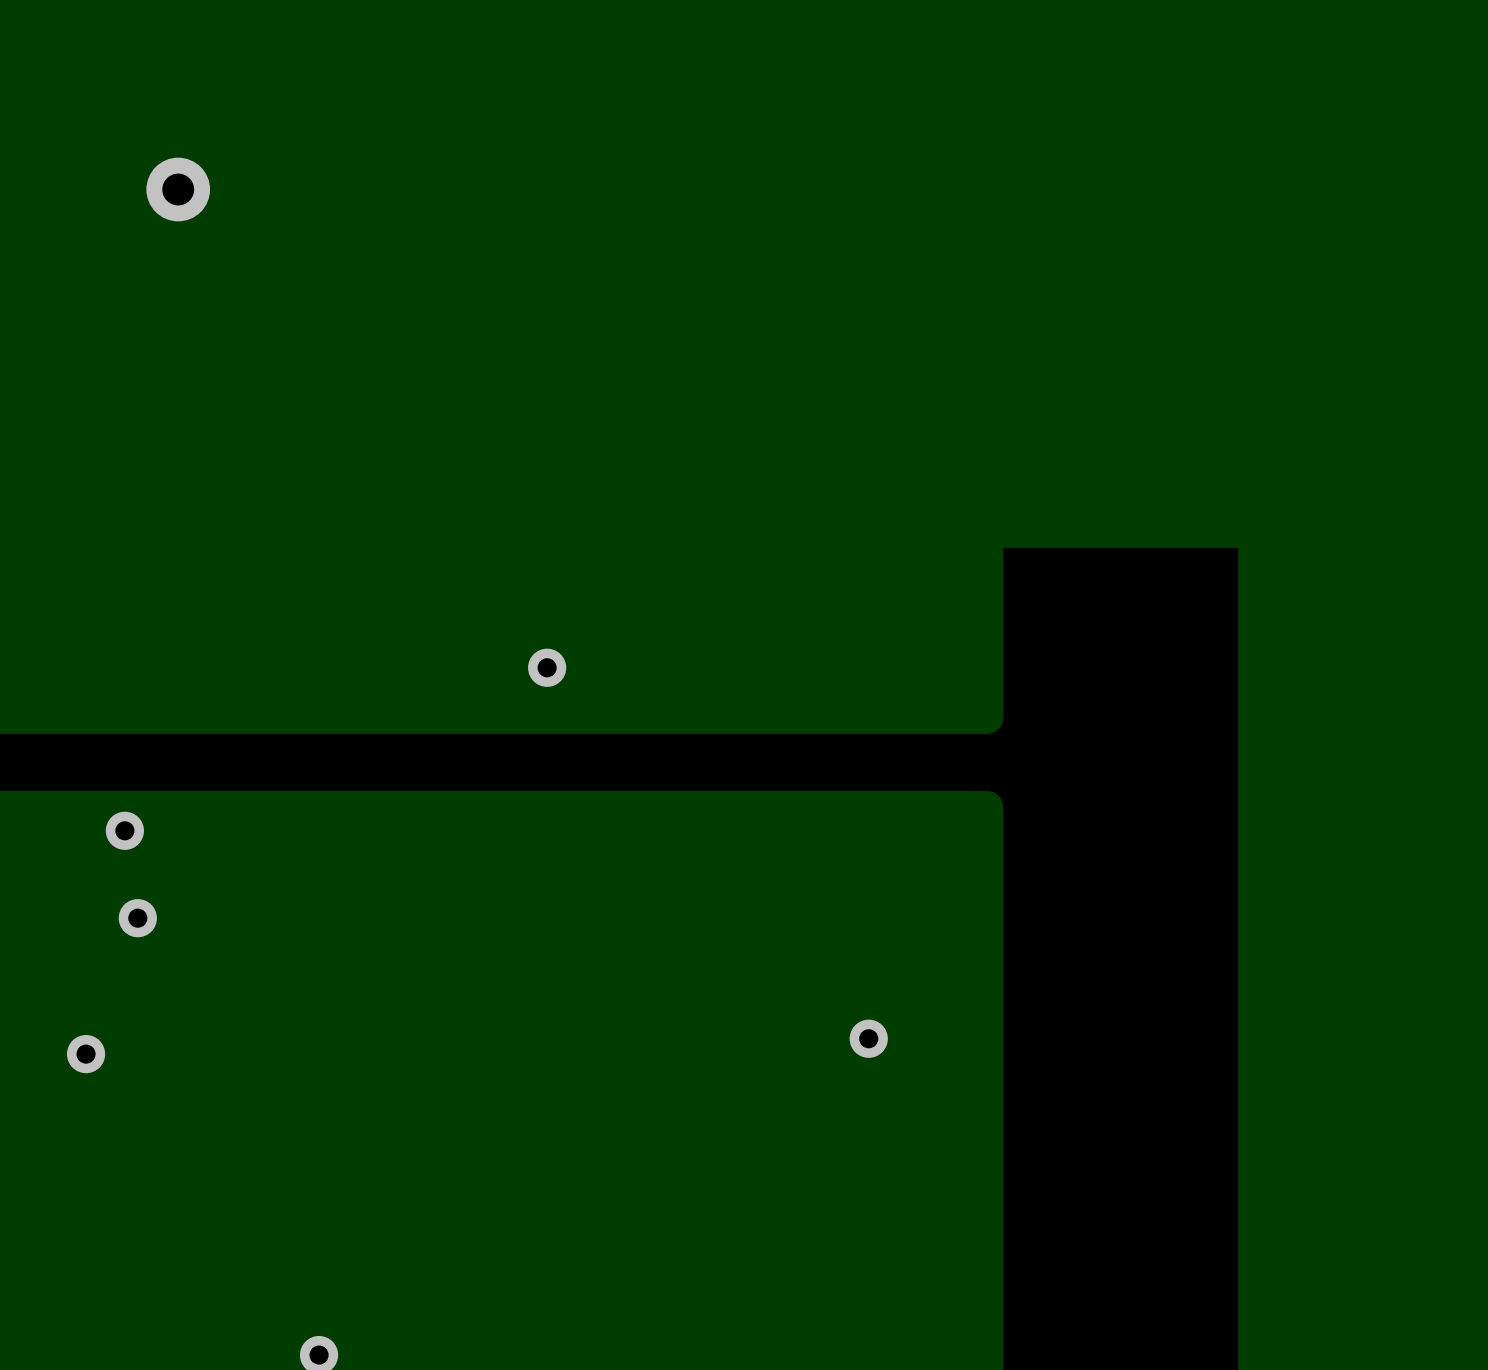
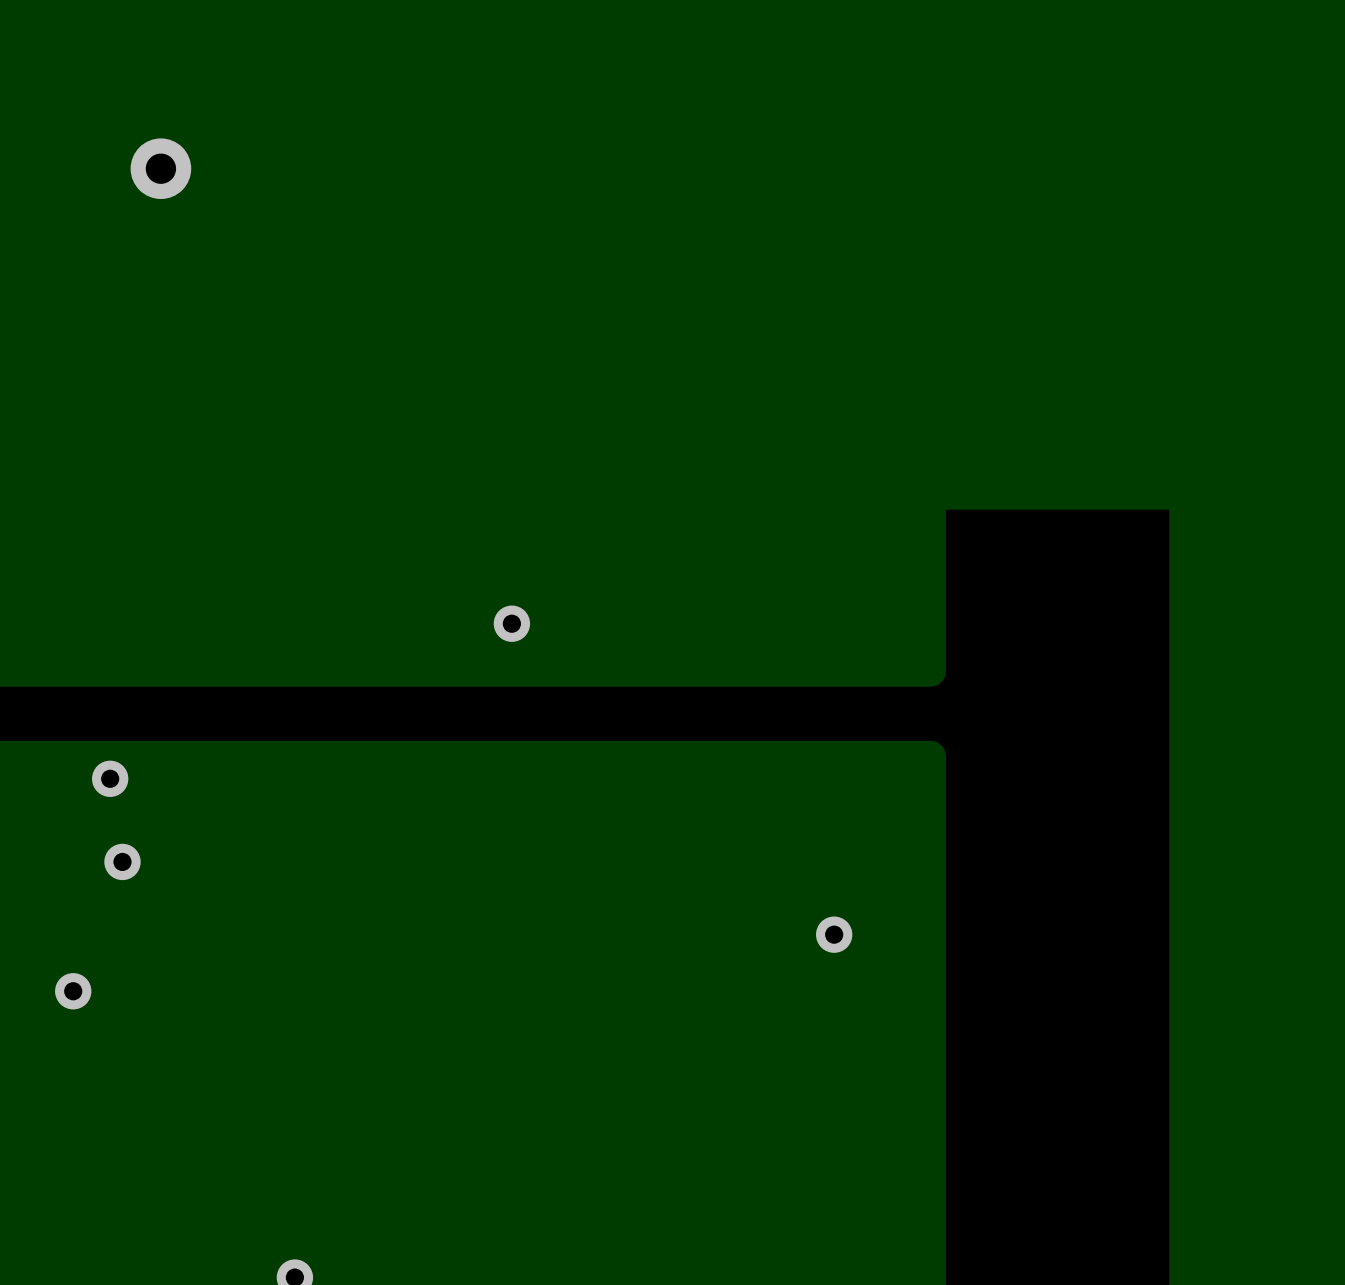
via position: (868, 1038) -> (834, 934)

